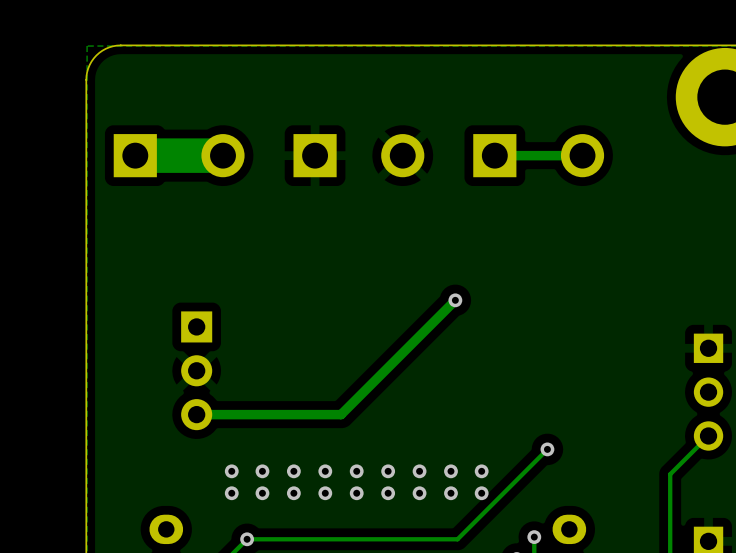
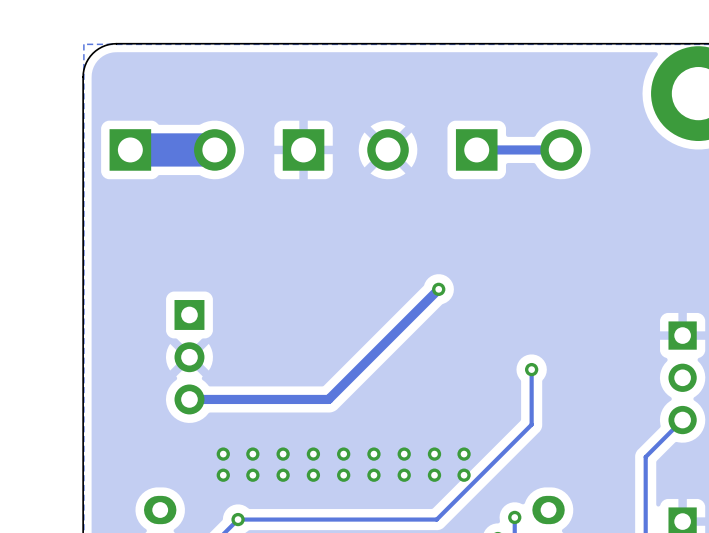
track: (547, 449) (457, 539) (453, 539) -> (531, 369) (531, 424) (436, 519)
via position: (547, 449) -> (531, 369)

